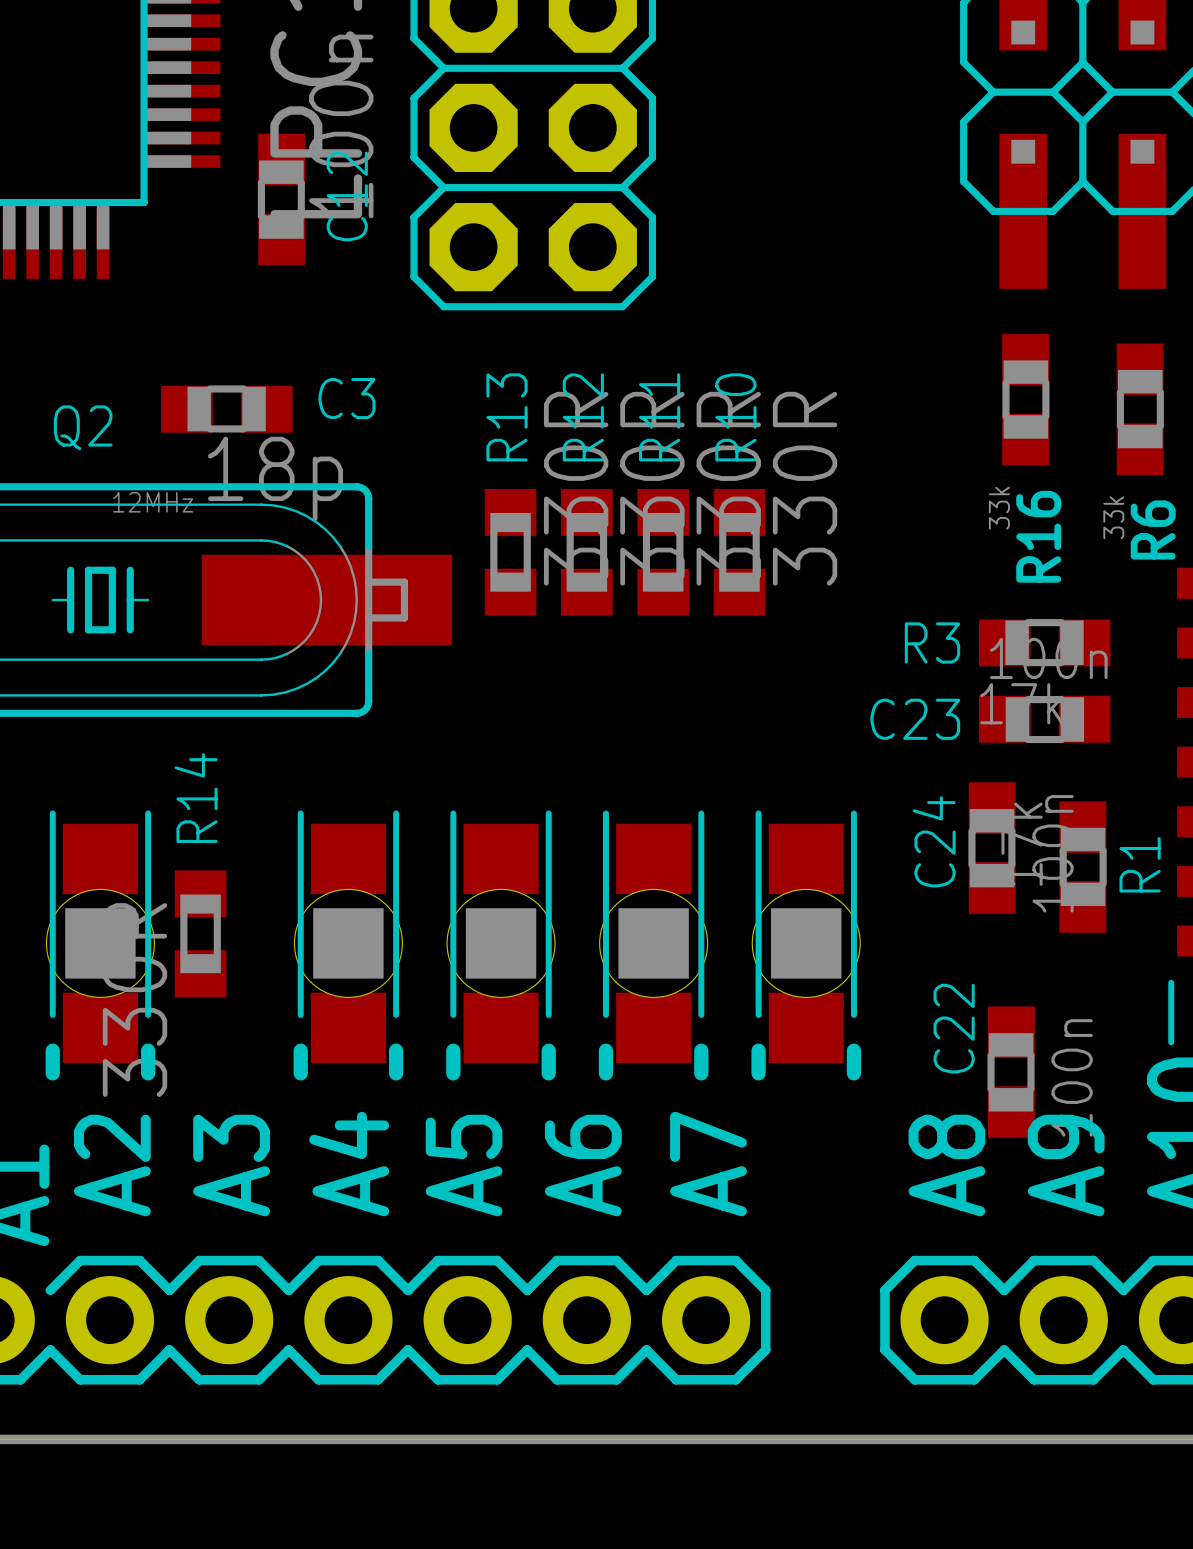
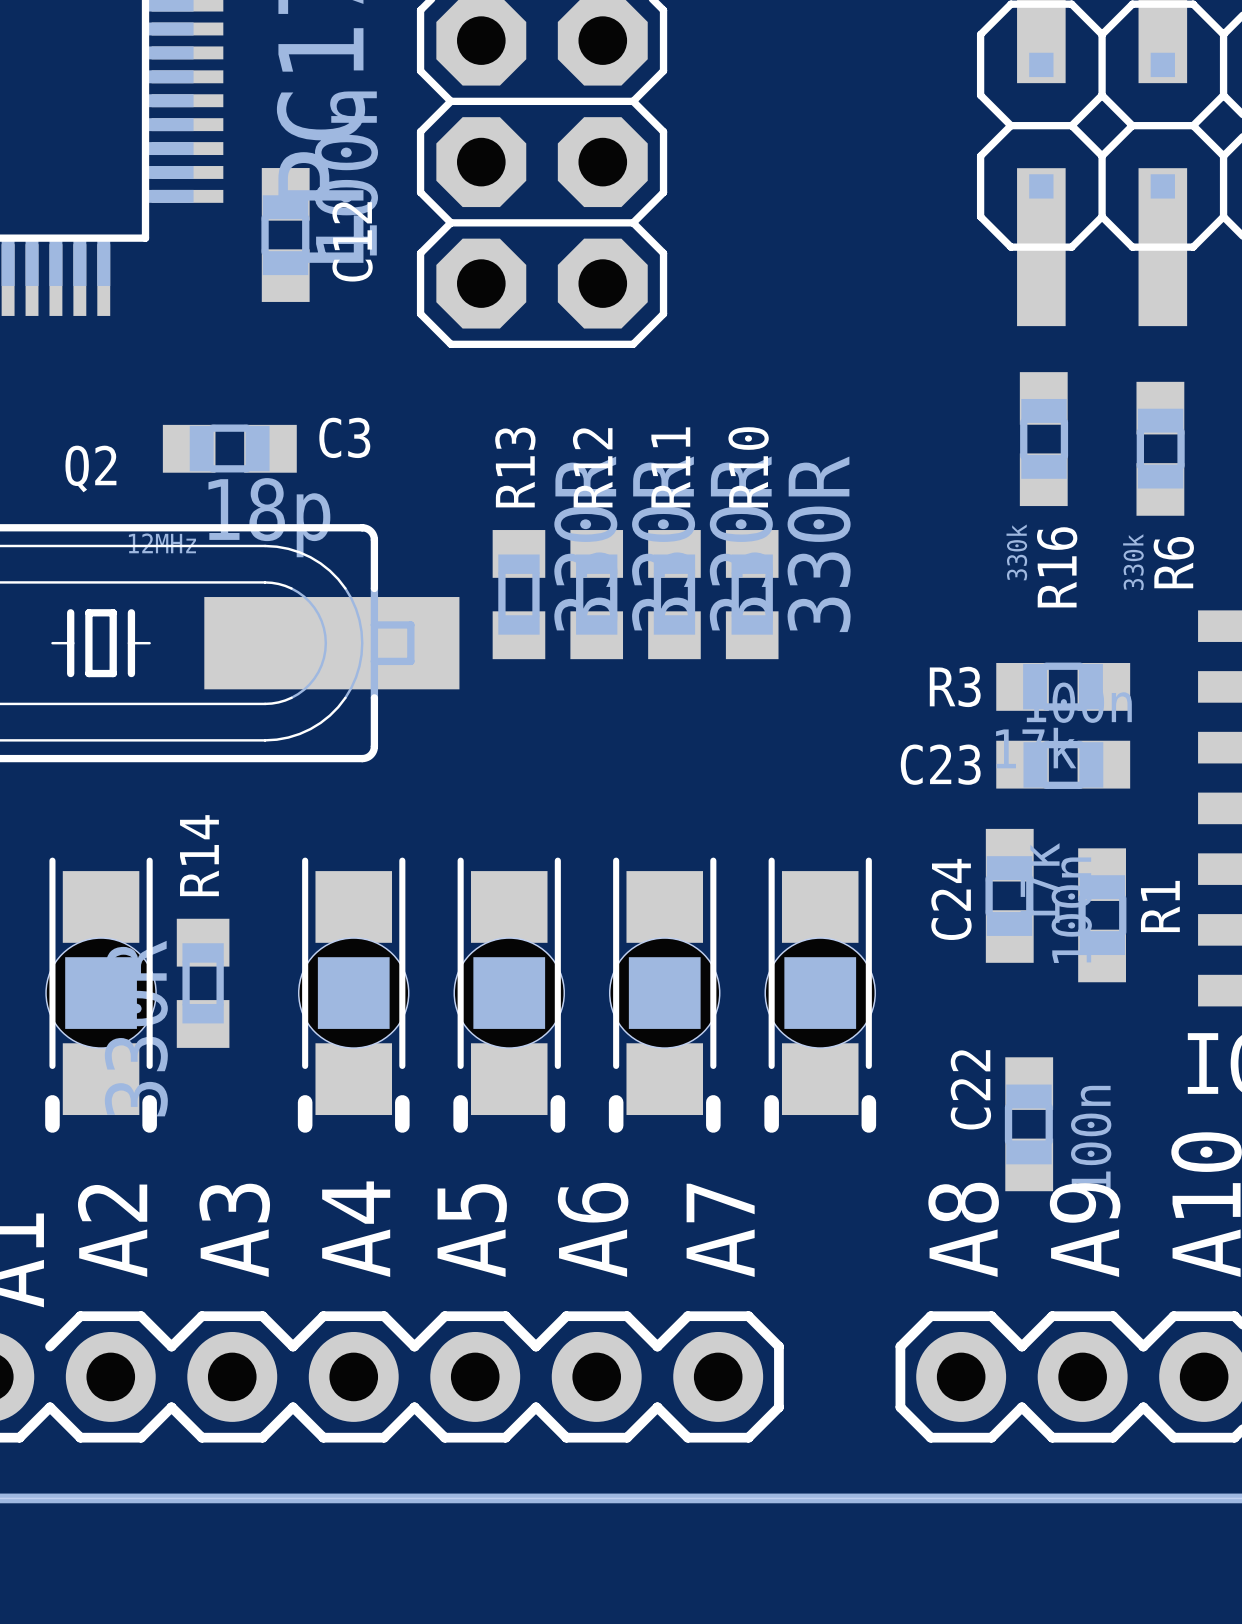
R16 value: 33k (999, 508) -> 330k (1016, 552)
R6 value: 33k (1113, 517) -> 330k (1133, 562)

